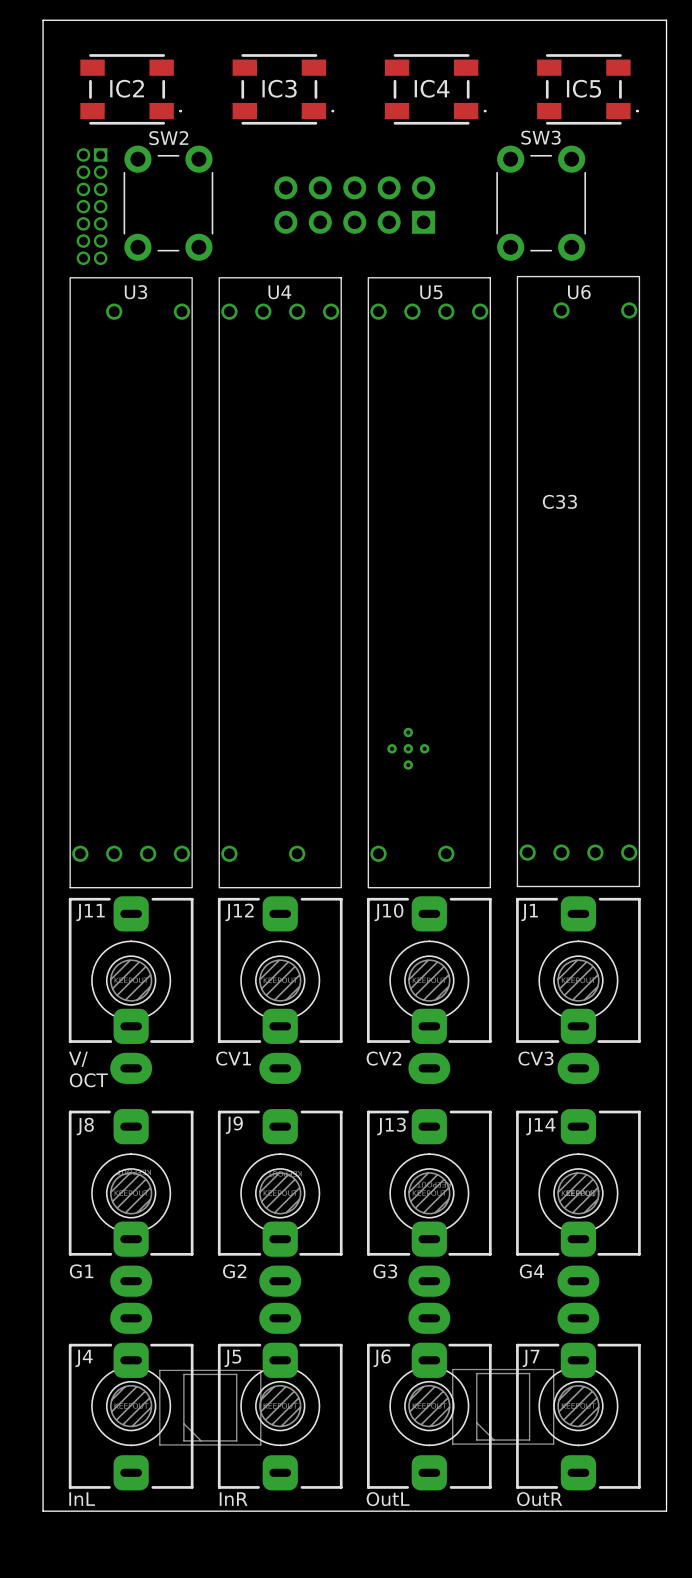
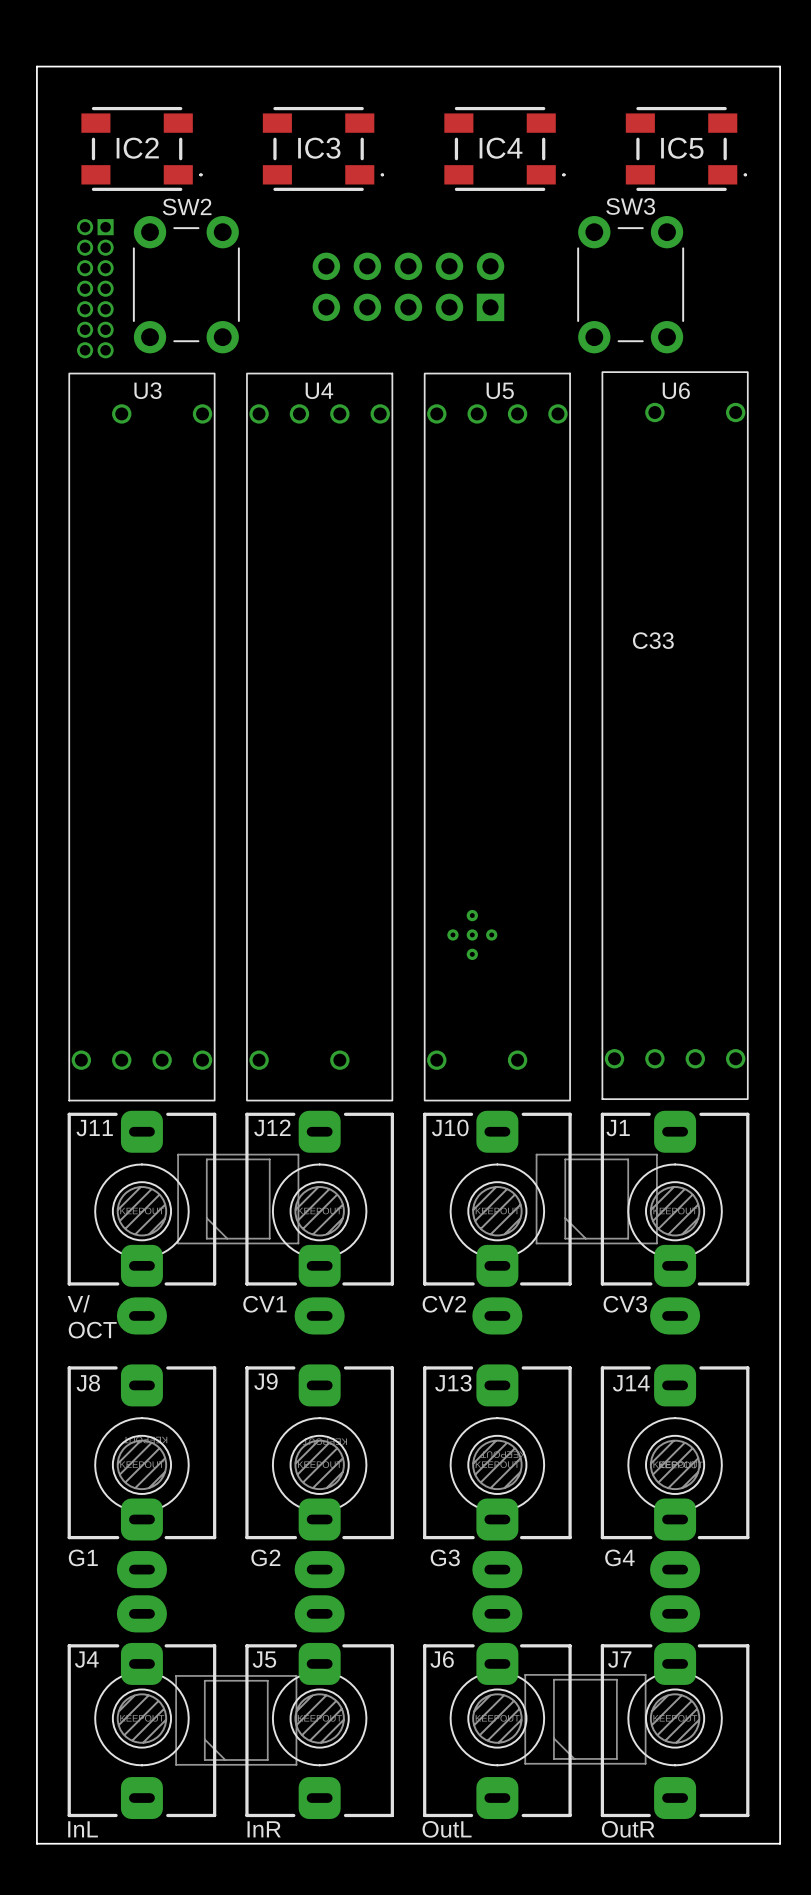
part: none -> (238, 1199)
part: none -> (596, 1199)

